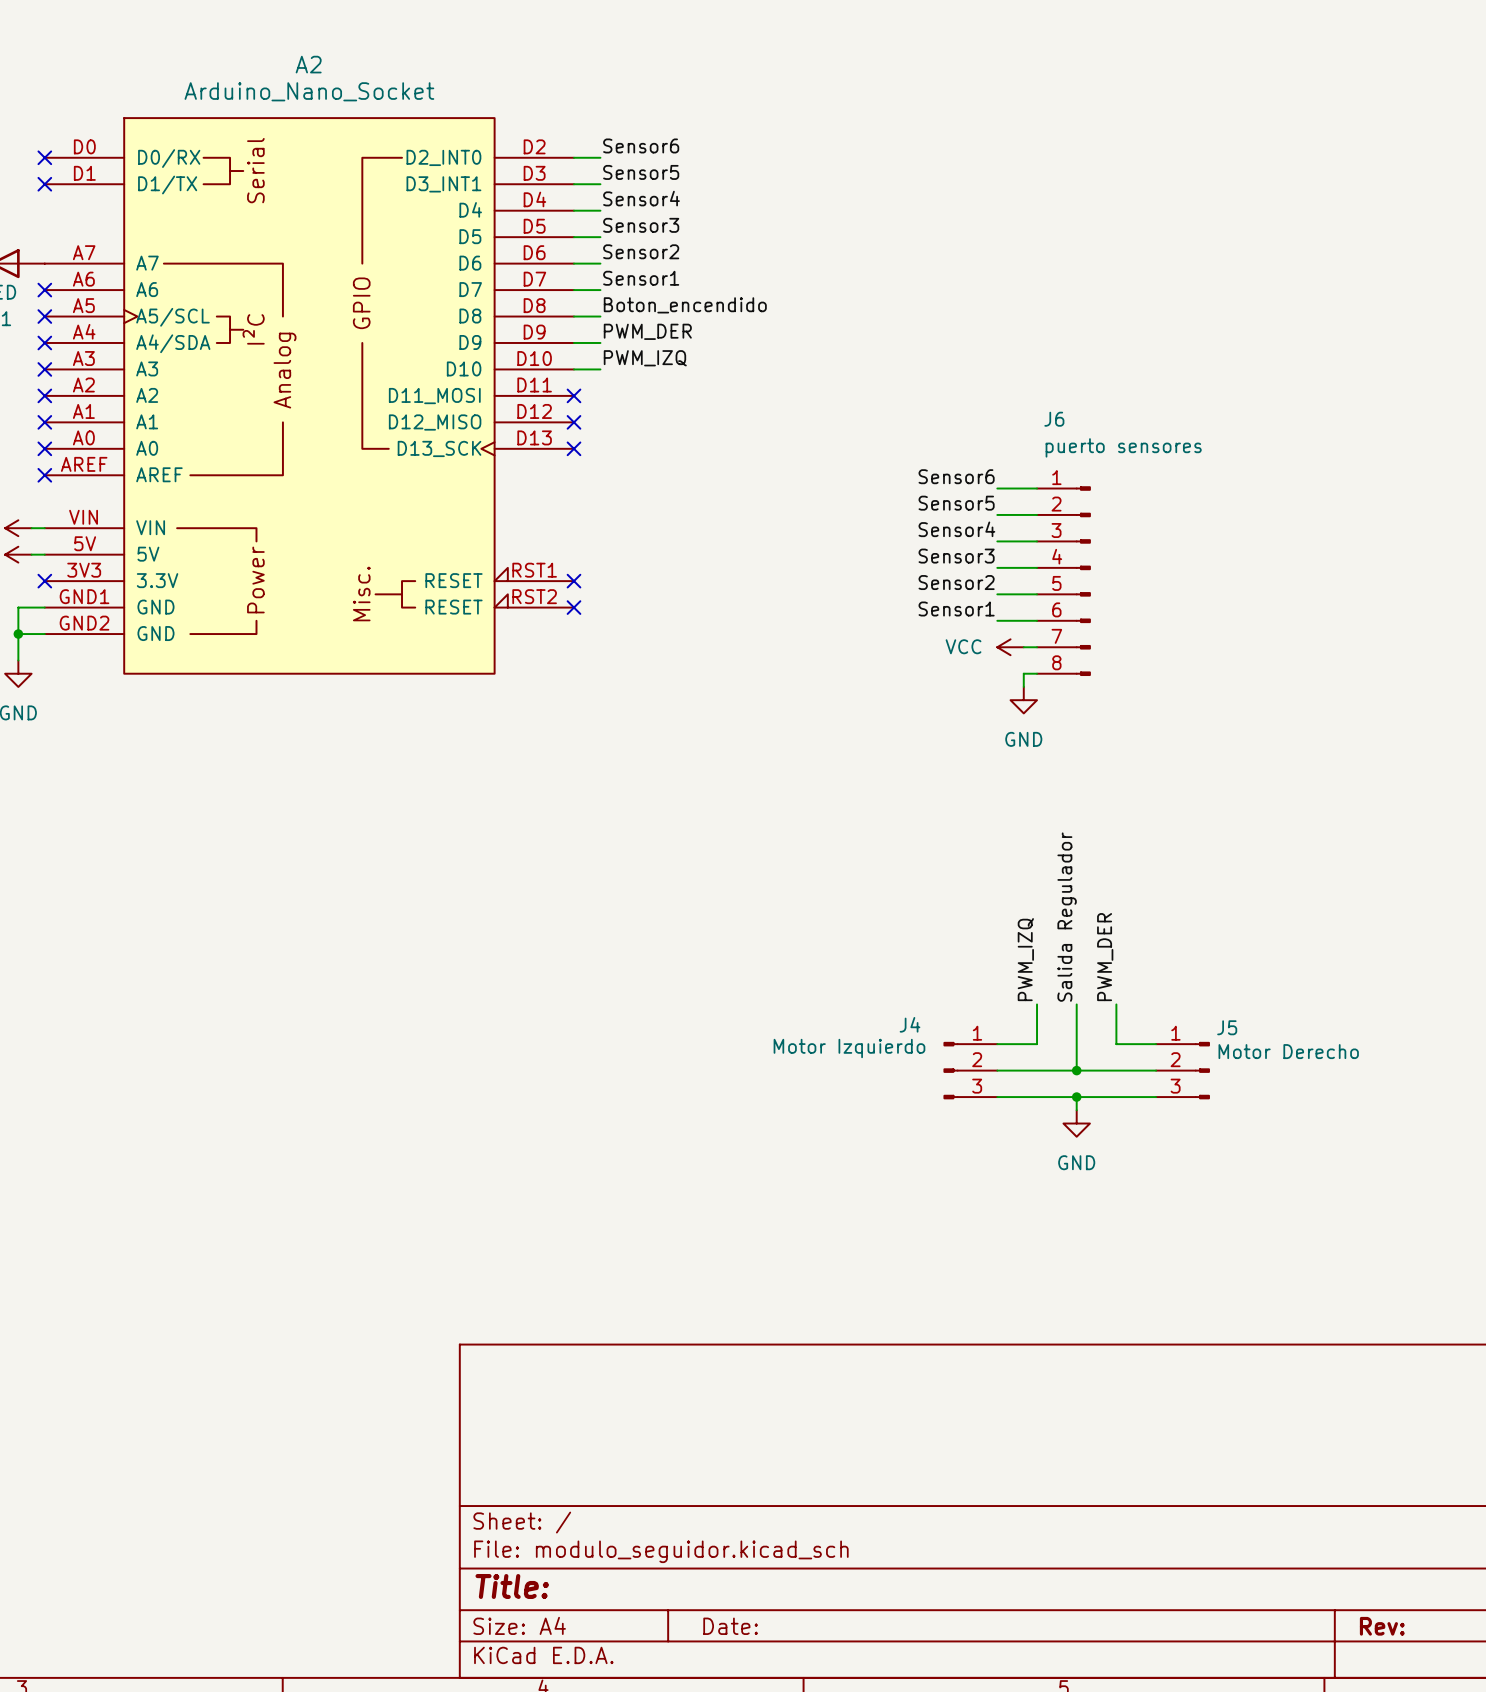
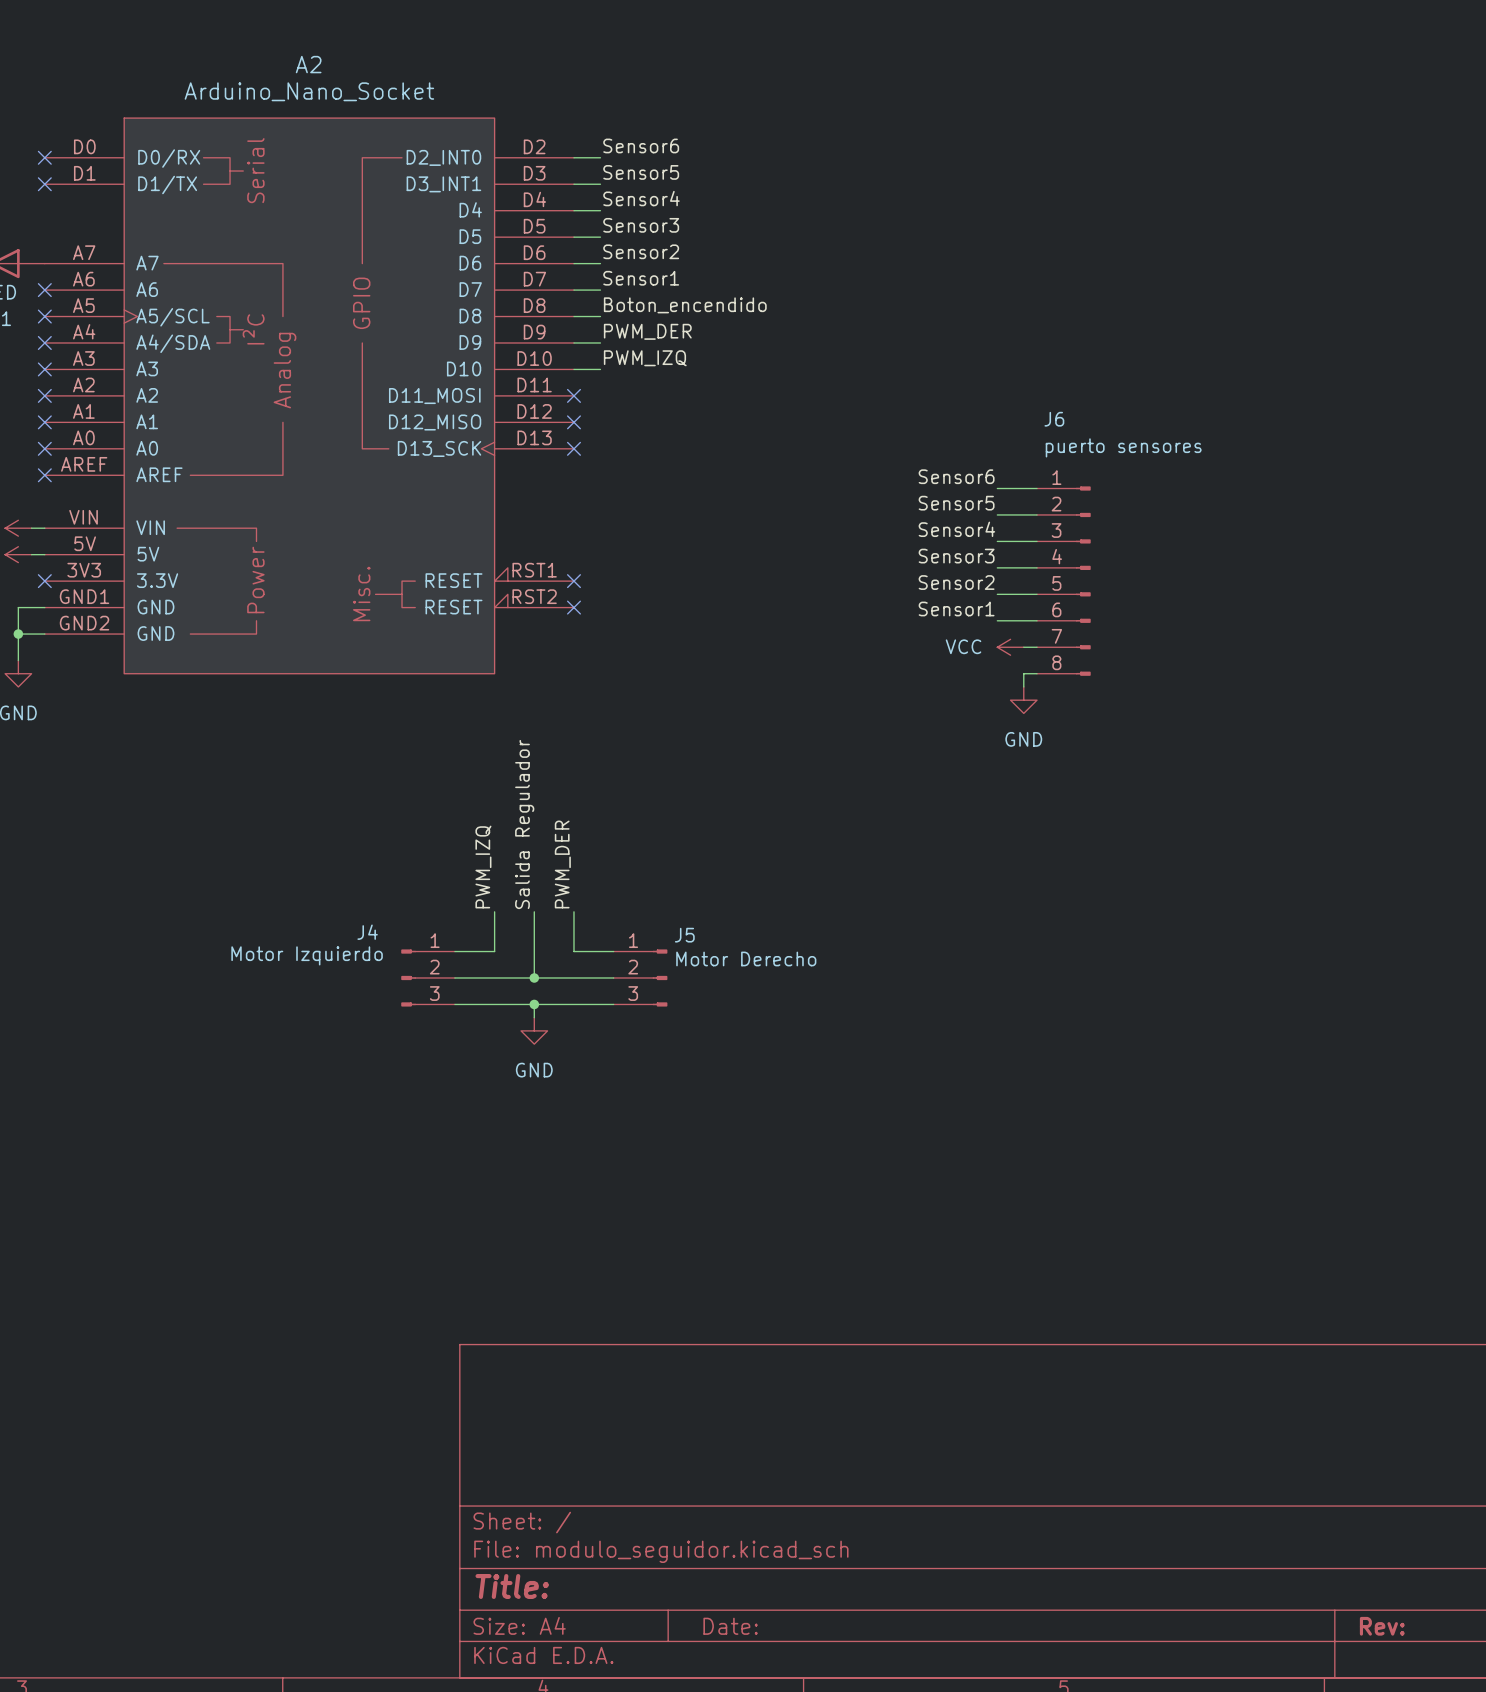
label: none -> Salida Regulador (524, 824)
label: none -> PWM_DER (562, 864)
label: none -> PWM_IZQ (483, 867)
wire: none -> (494, 911) (494, 951) (454, 951)
wire: none -> (534, 911) (534, 977)
wire: none -> (573, 911) (573, 951) (613, 951)
label: Salida Regulador (1067, 917) -> none
label: PWM_DER (1105, 957) -> none
label: PWM_IZQ (1025, 959) -> none
wire: none -> (454, 977) (613, 977)
junction: none -> (534, 977)
wire: none -> (454, 1004) (613, 1004)
wire: none -> (534, 1004) (534, 1017)
junction: none -> (534, 1004)
wire: (1037, 1004) (1037, 1044) (997, 1044) -> none
wire: (1076, 1004) (1076, 1070) -> none
wire: (1116, 1004) (1116, 1044) (1156, 1044) -> none
power symbol: none -> GND (534, 1030)
J4 position: (970, 1070) -> (428, 977)
wire: (997, 1070) (1156, 1070) -> none
junction: (1076, 1070) -> none
J5 position: (1182, 1070) -> (640, 977)
wire: (997, 1097) (1156, 1097) -> none
wire: (1076, 1097) (1076, 1110) -> none
junction: (1076, 1097) -> none
power symbol: GND (1076, 1123) -> none

